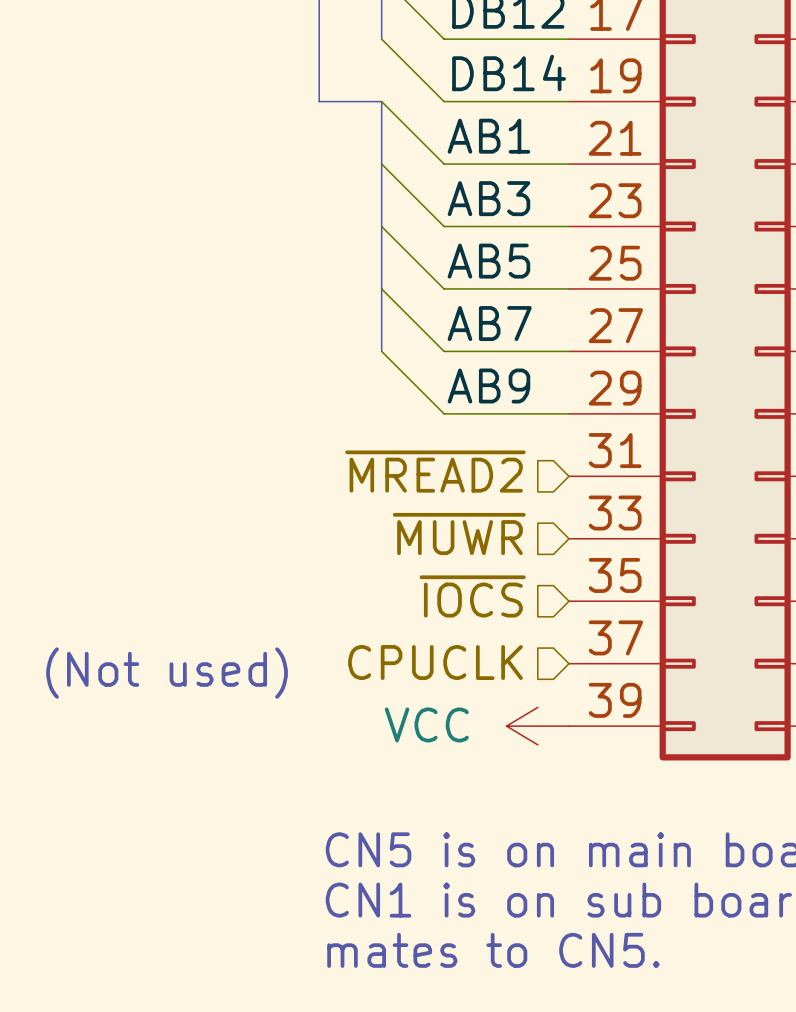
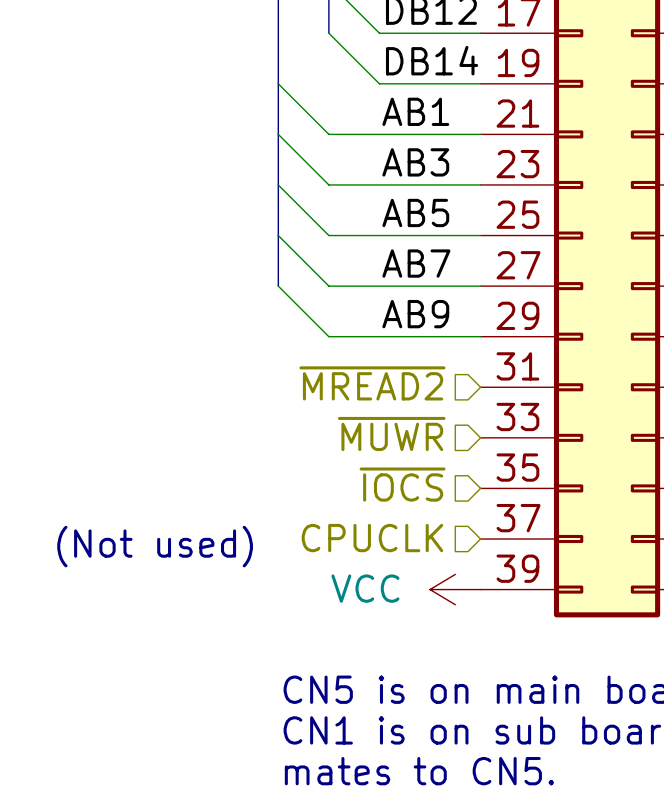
bus: (319, 101) (381, 101) (381, 351) -> (278, 83) (278, 286)
wire: (381, 101) (444, 164) -> (278, 83) (328, 134) (379, 134)
wire: (381, 164) (444, 226) -> (278, 134) (328, 184) (379, 184)
wire: (381, 226) (444, 288) -> (278, 184) (328, 235) (379, 235)
wire: (381, 288) (444, 351) -> (278, 235) (328, 286) (379, 286)
wire: (381, 351) (444, 413) -> (278, 286) (328, 336) (379, 336)

